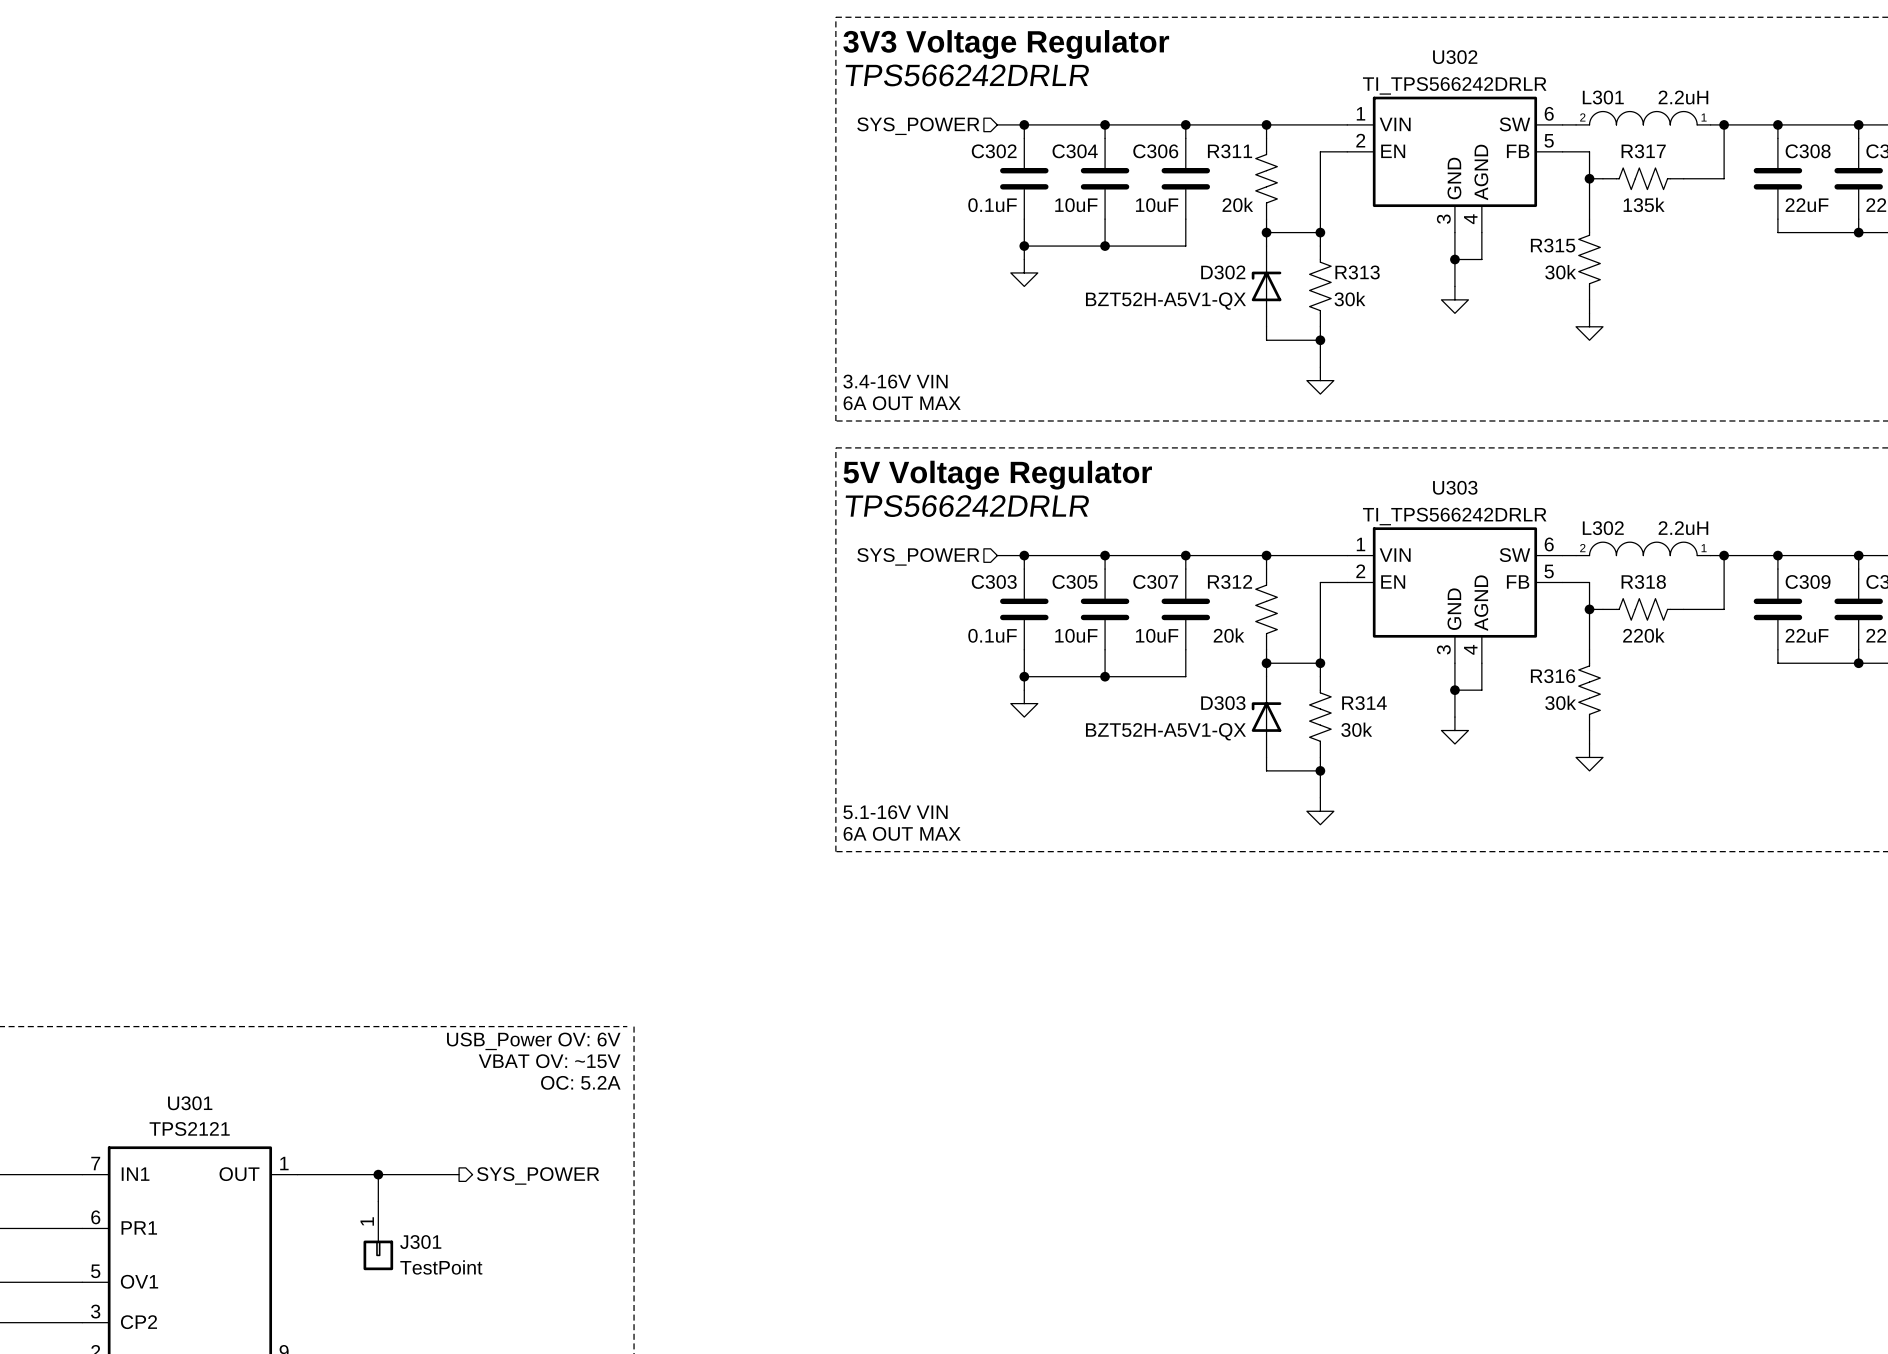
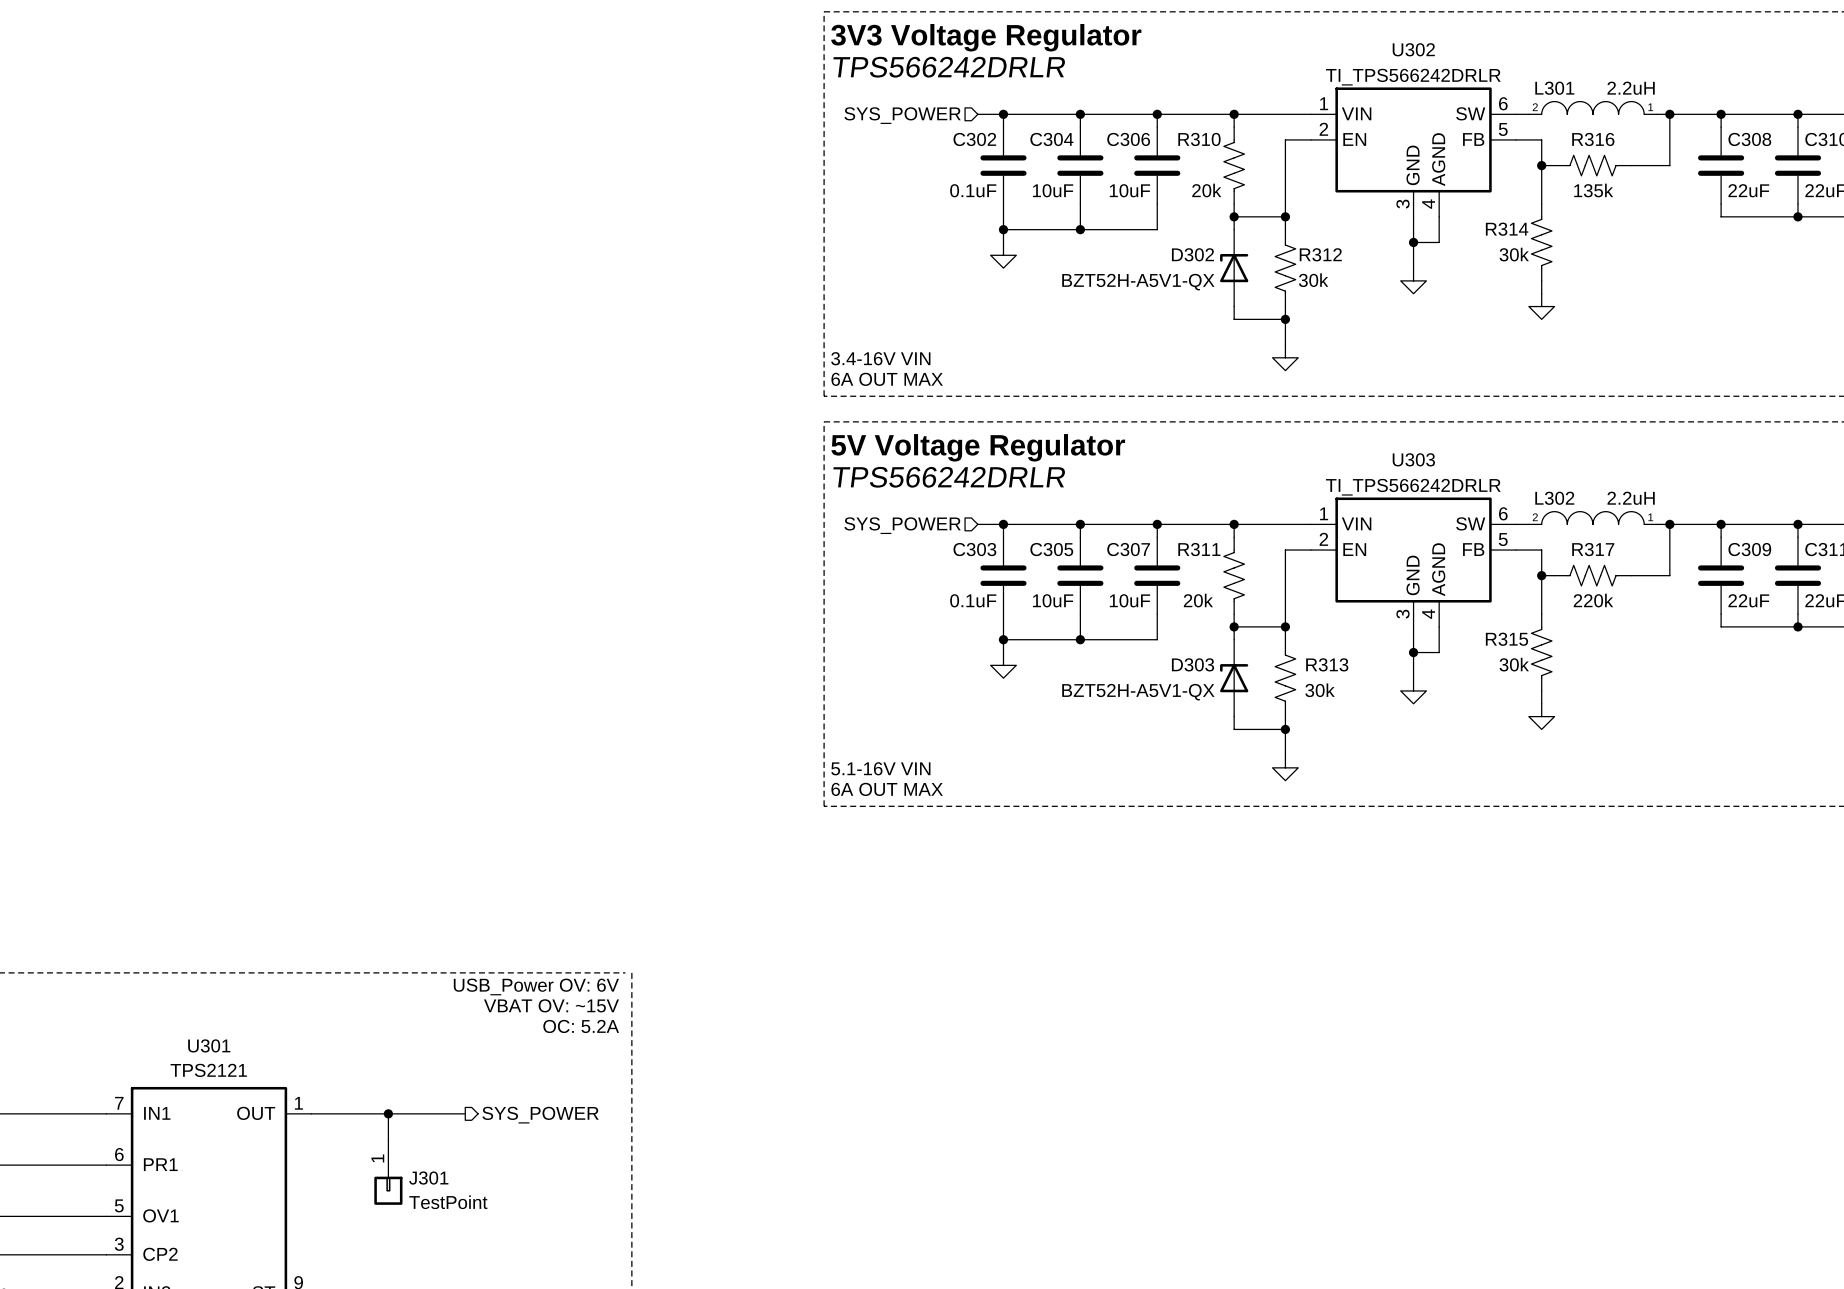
R311 name: R311 (1230, 151) -> R310 (1199, 139)
R317 name: R317 (1643, 151) -> R316 (1593, 139)
R315 name: R315 (1553, 245) -> R314 (1507, 229)
R313 name: R313 (1357, 272) -> R312 (1320, 254)
R312 name: R312 (1230, 581) -> R311 (1199, 549)
R318 name: R318 (1643, 581) -> R317 (1593, 549)
R316 name: R316 (1553, 676) -> R315 (1506, 639)
R314 name: R314 (1364, 703) -> R313 (1327, 664)

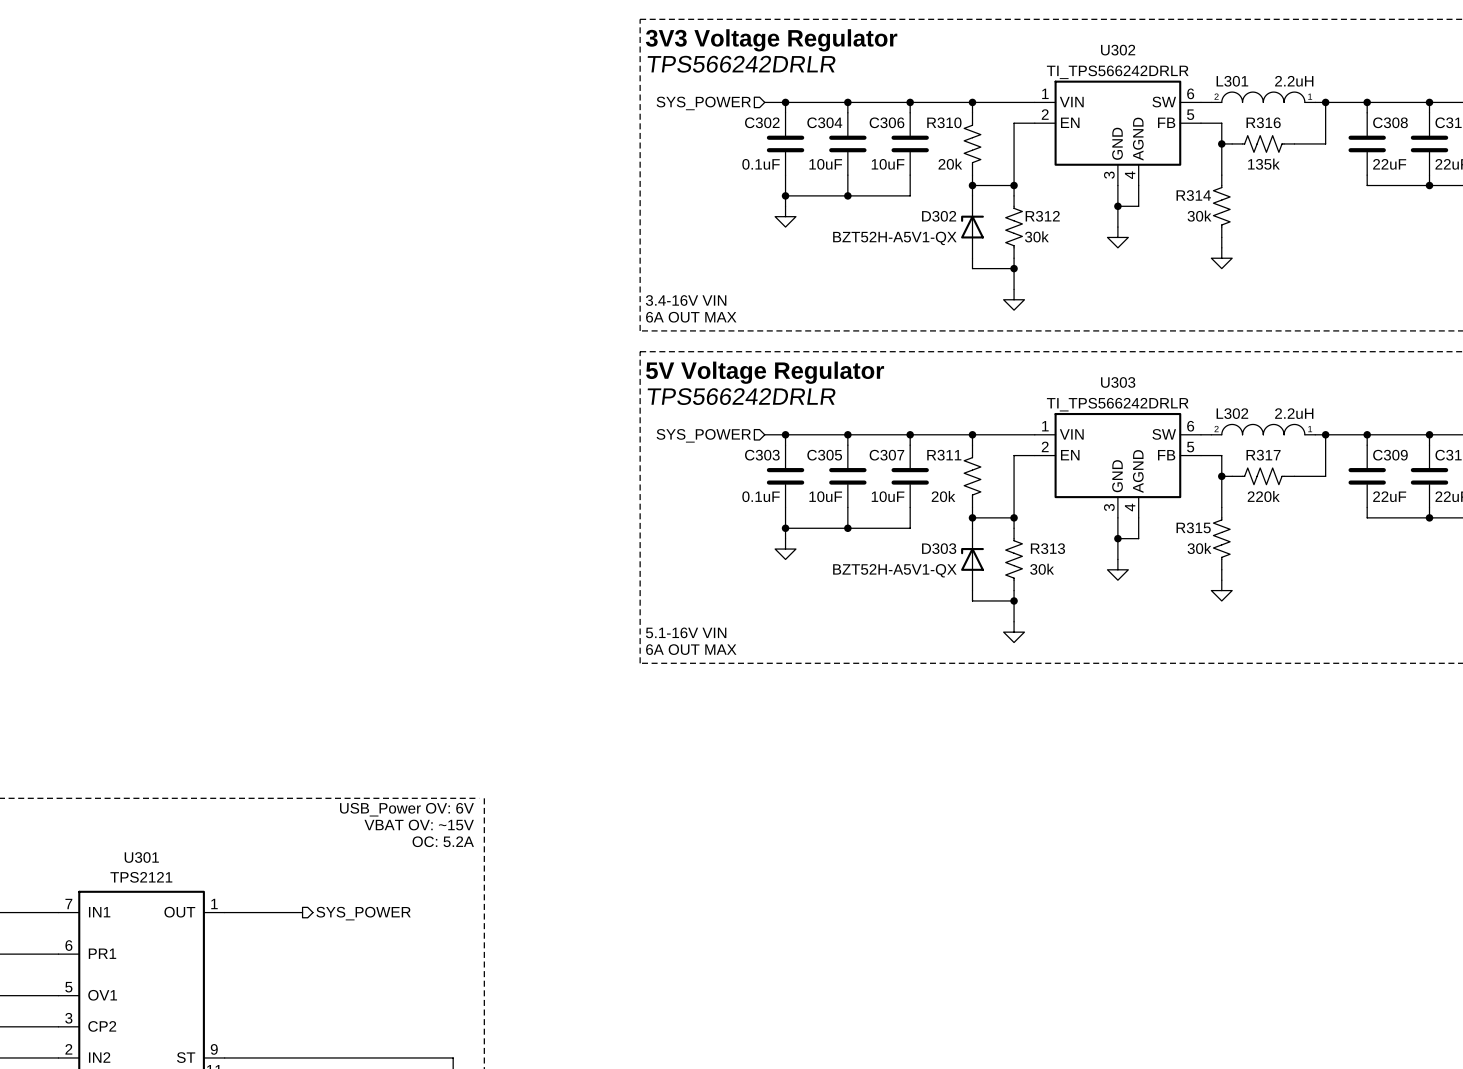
wire: (388, 1113) (388, 1139) -> none
junction: (388, 1113) -> none
wire: (407, 1113) (465, 1113) -> none
hierarchical label position: SYS_POWER (540, 1115) -> SYS_POWER (363, 913)
J301: TestPoint (388, 1172) -> none

